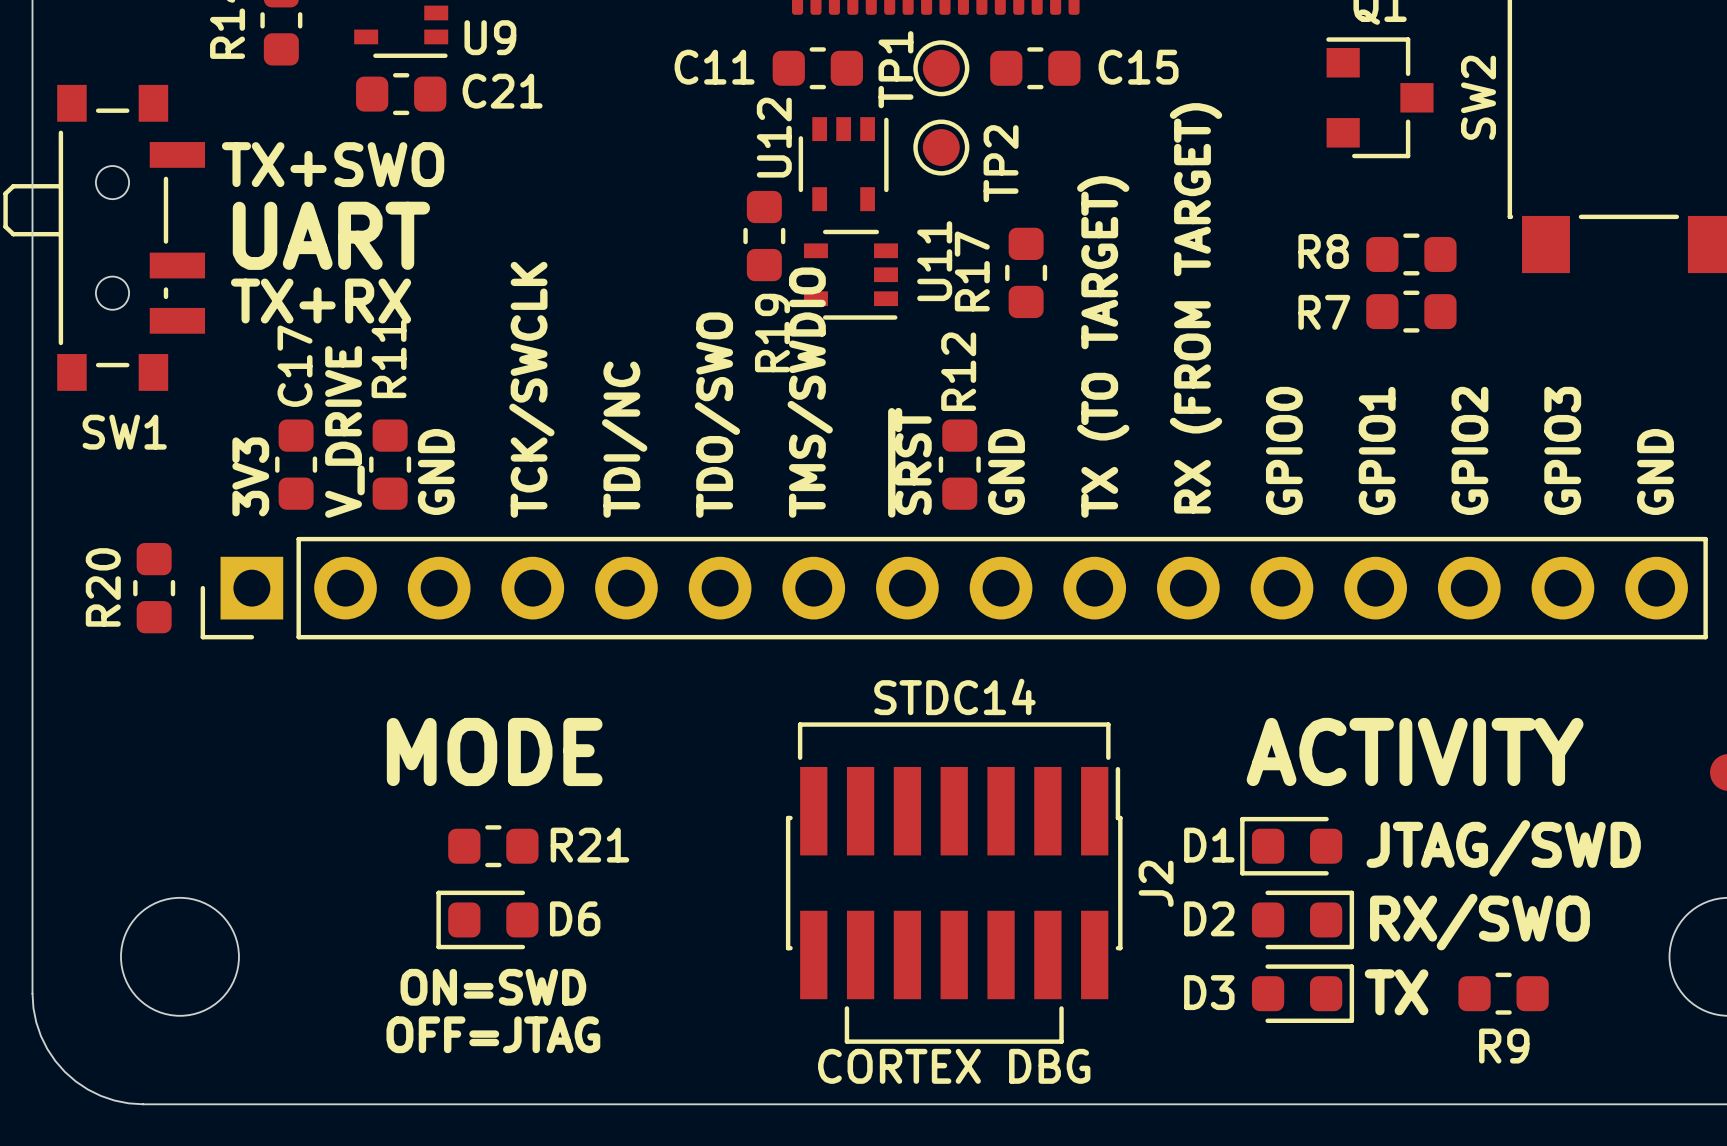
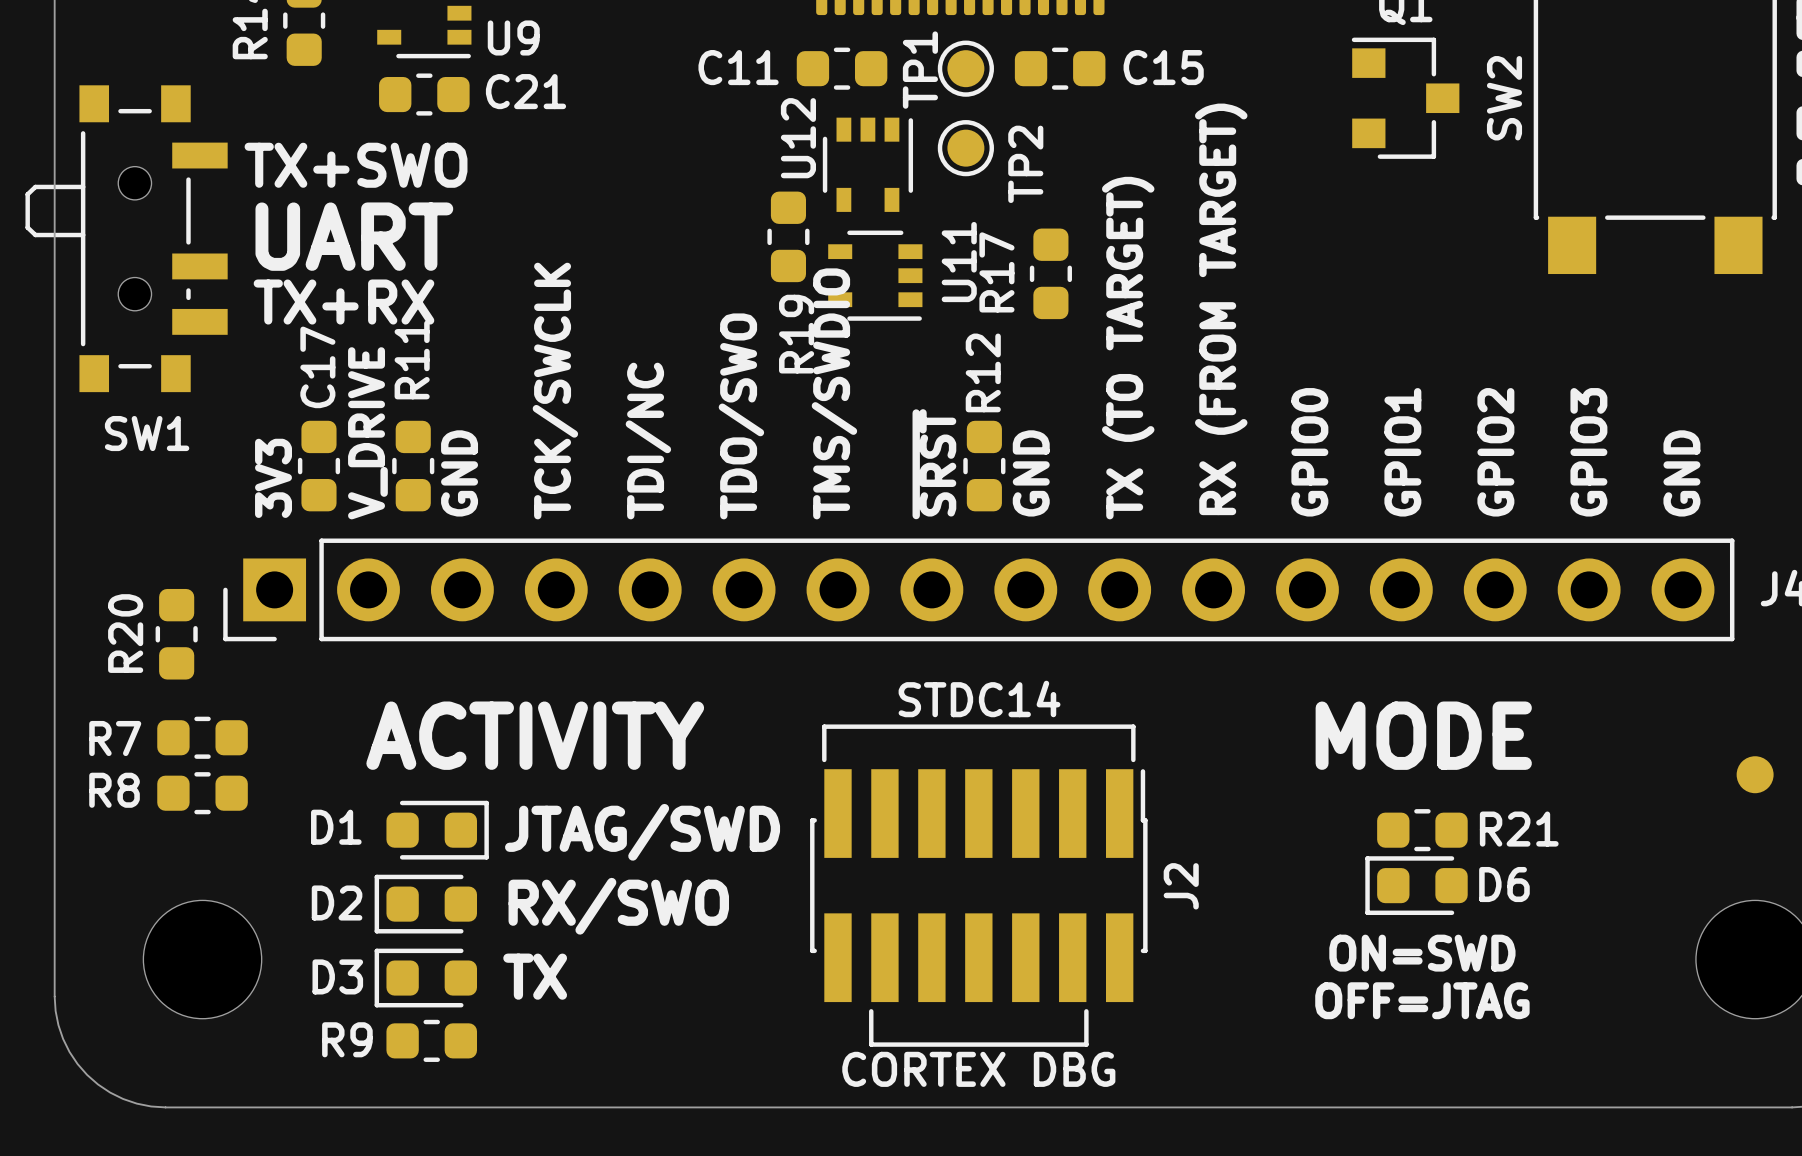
R8 position: (1411, 254) -> (202, 793)
R7 position: (1411, 311) -> (202, 737)
R20 position: (154, 588) -> (176, 634)
text position: MODE (494, 751) -> MODE (1423, 735)
text position: ACTIVITY (1415, 751) -> ACTIVITY (535, 735)
R21 position: (493, 846) -> (1422, 830)
D1 rotation: 0° (1291, 846) -> 180° (437, 830)
D1 position: (1291, 846) -> (437, 830)
text position: JTAG/SWD (1503, 848) -> JTAG/SWD (642, 832)
D6 position: (487, 919) -> (1416, 885)
D2 rotation: 0° (1303, 919) -> 180° (425, 904)
D2 position: (1303, 919) -> (425, 904)
text position: RX/SWO (1479, 922) -> RX/SWO (618, 906)
text position: ON=SWD (493, 987) -> ON=SWD (1422, 953)
text position: TX (1396, 992) -> TX (535, 976)
D3 rotation: 0° (1303, 993) -> 180° (425, 978)
D3 position: (1303, 993) -> (425, 978)
R9 position: (1503, 993) -> (431, 1040)
text position: OFF=JTAG (493, 1034) -> OFF=JTAG (1422, 1000)
R9 name position: R9 (1504, 1046) -> R9 (347, 1039)

